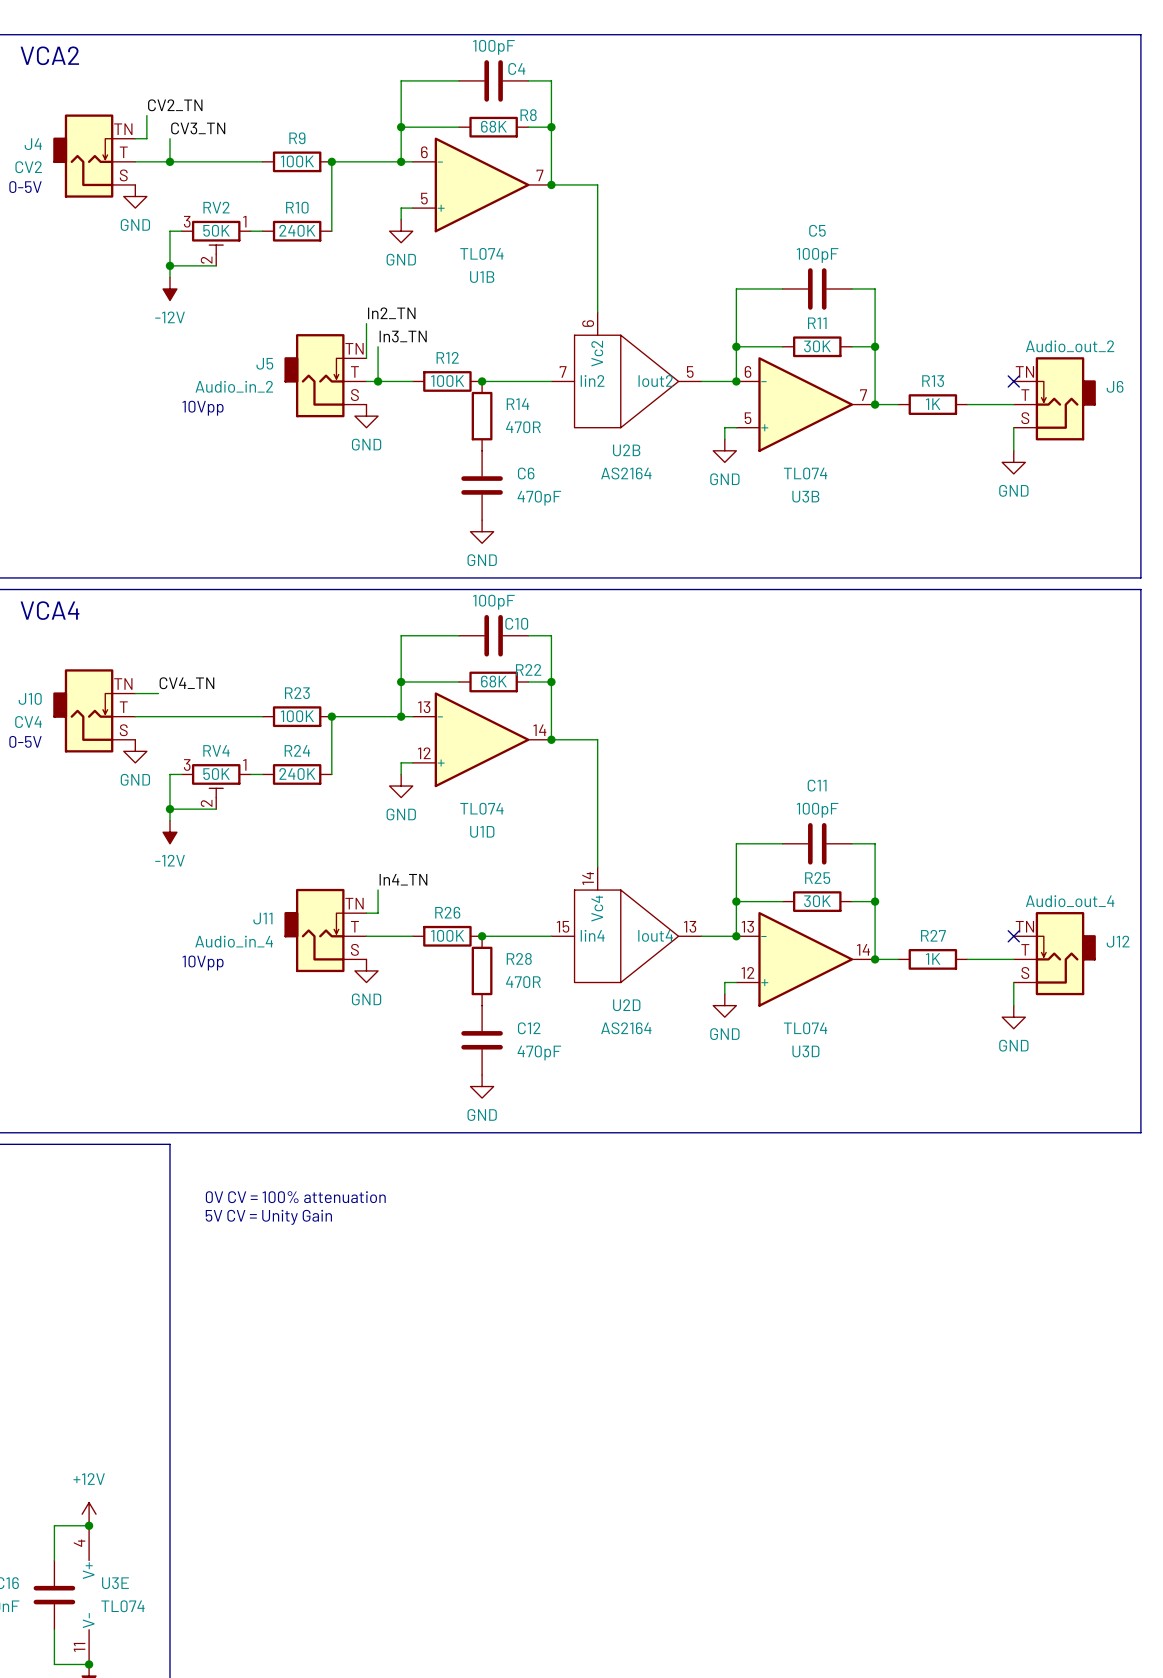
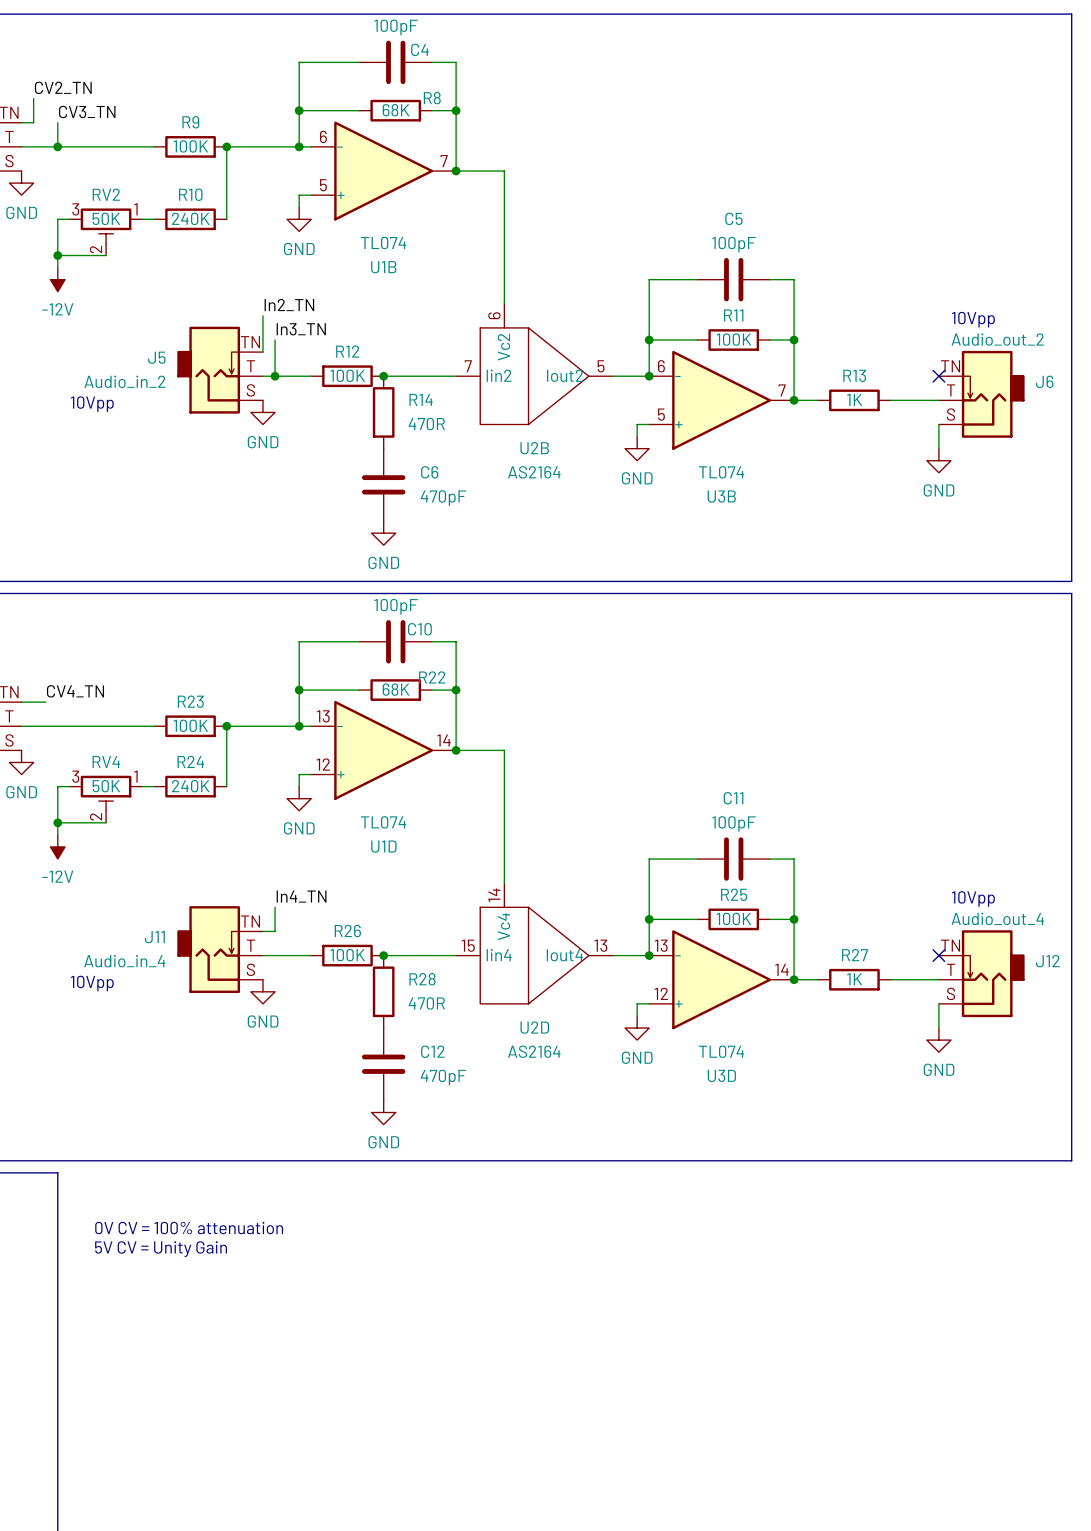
text: none -> 10Vpp (973, 319)
R11 value: 30K (817, 346) -> 100K (733, 339)
text: none -> 10Vpp (973, 899)
R25 value: 30K (817, 901) -> 100K (733, 918)

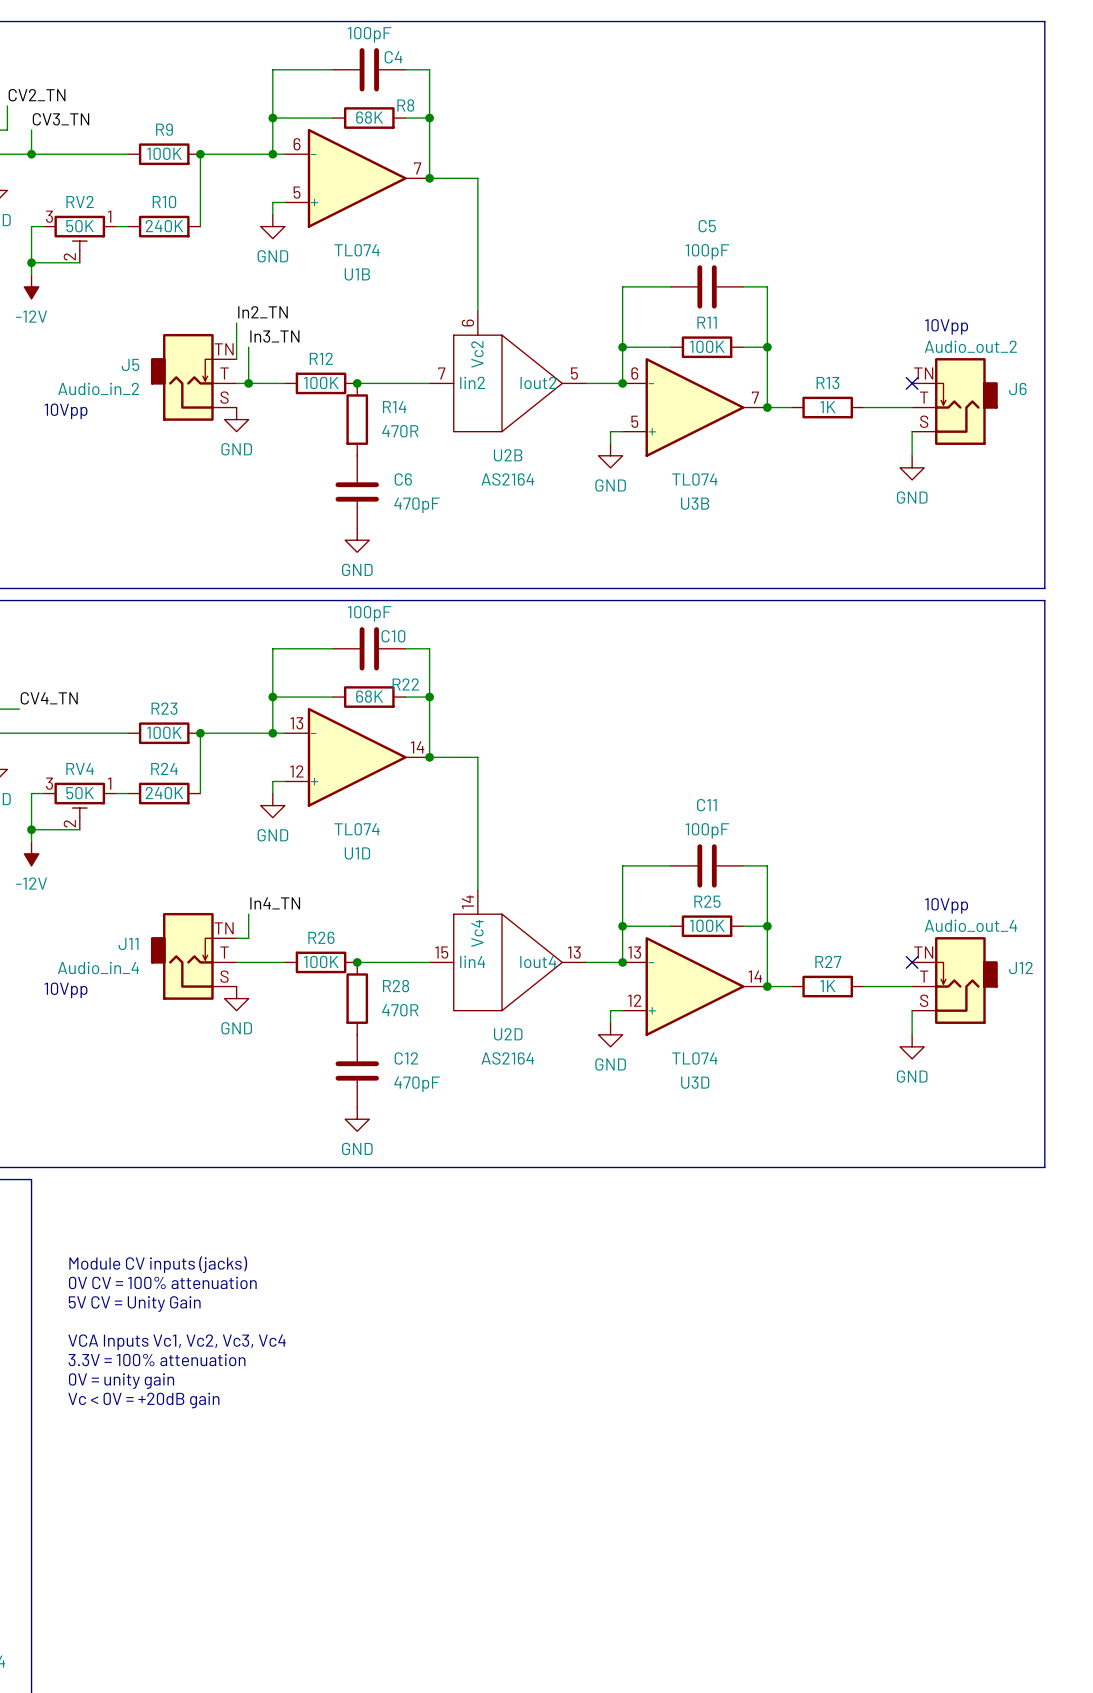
text position: 0V CV = 100% attenuation (189, 1228) -> 0V CV = 100% attenuation (162, 1282)
text: 5V CV = Unity Gain (161, 1249) -> Module CV inputs (jacks) (158, 1264)
text: none -> 5V CV = Unity Gain (134, 1304)
text: none -> VCA Inputs Vc1, Vc2, Vc3, Vc4 (177, 1342)
text: none -> 3.3V = 100% attenuation (157, 1360)
text: none -> 0V = unity gain (121, 1381)
text: none -> Vc < 0V = +20dB gain (143, 1400)

